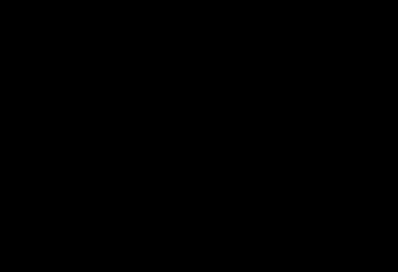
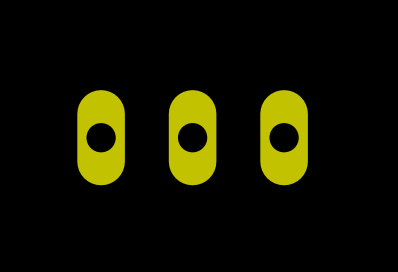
part: none -> (192, 137)

